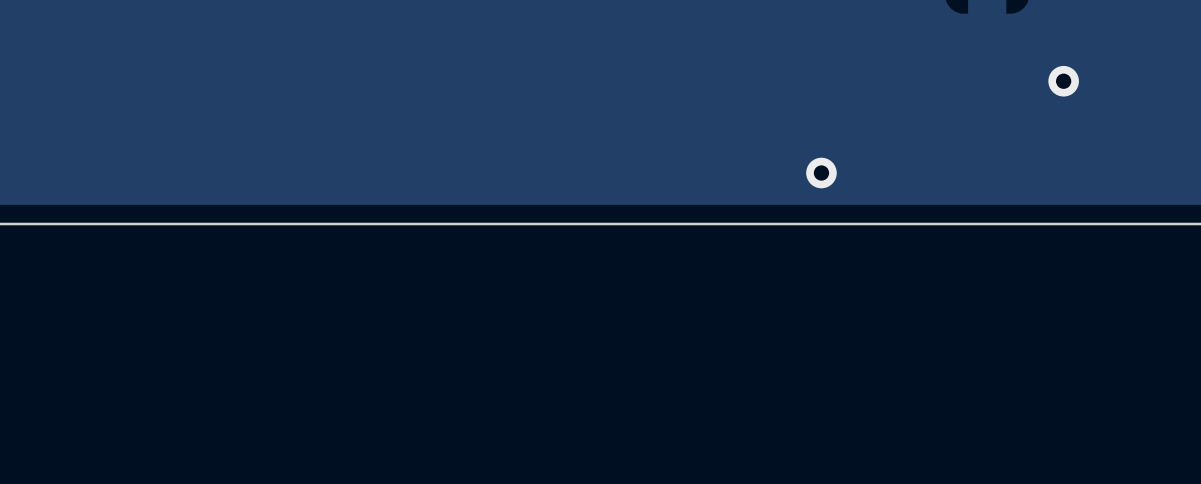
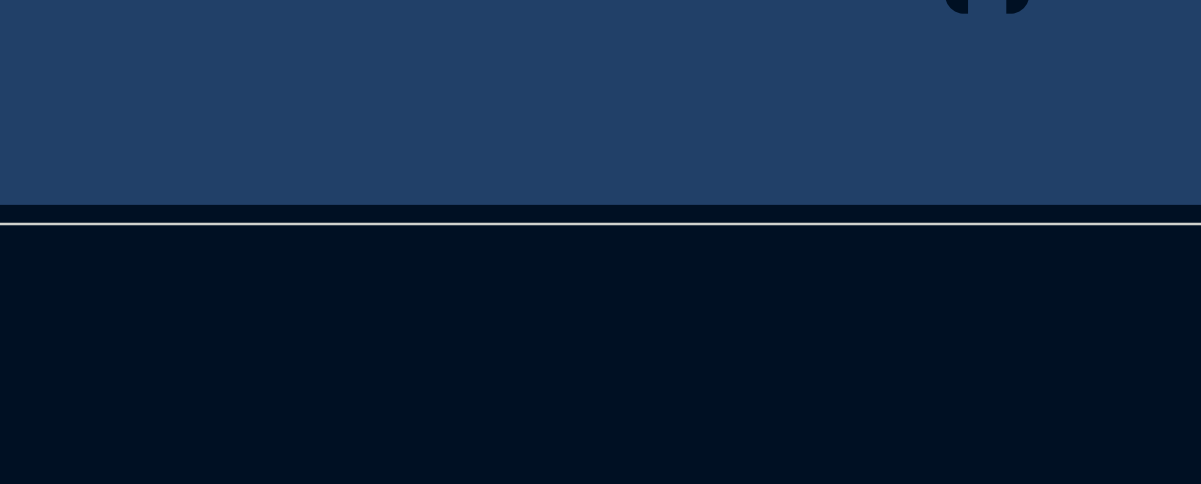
via: (1063, 81) -> none
via: (821, 173) -> none

